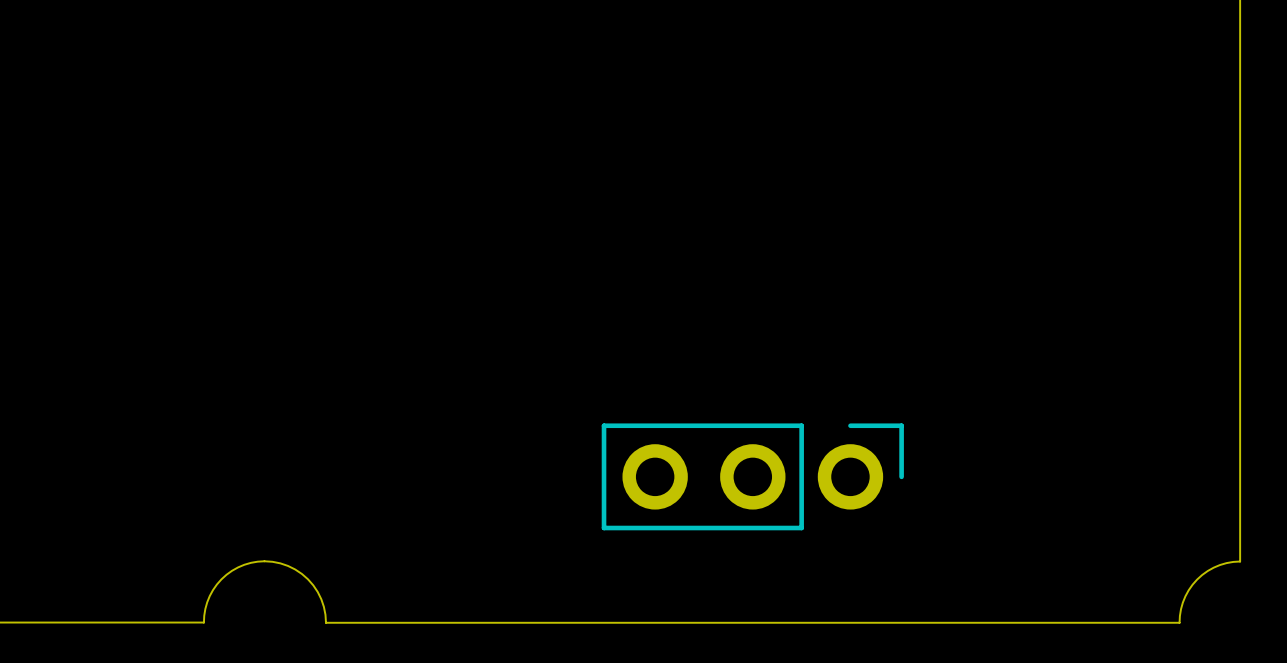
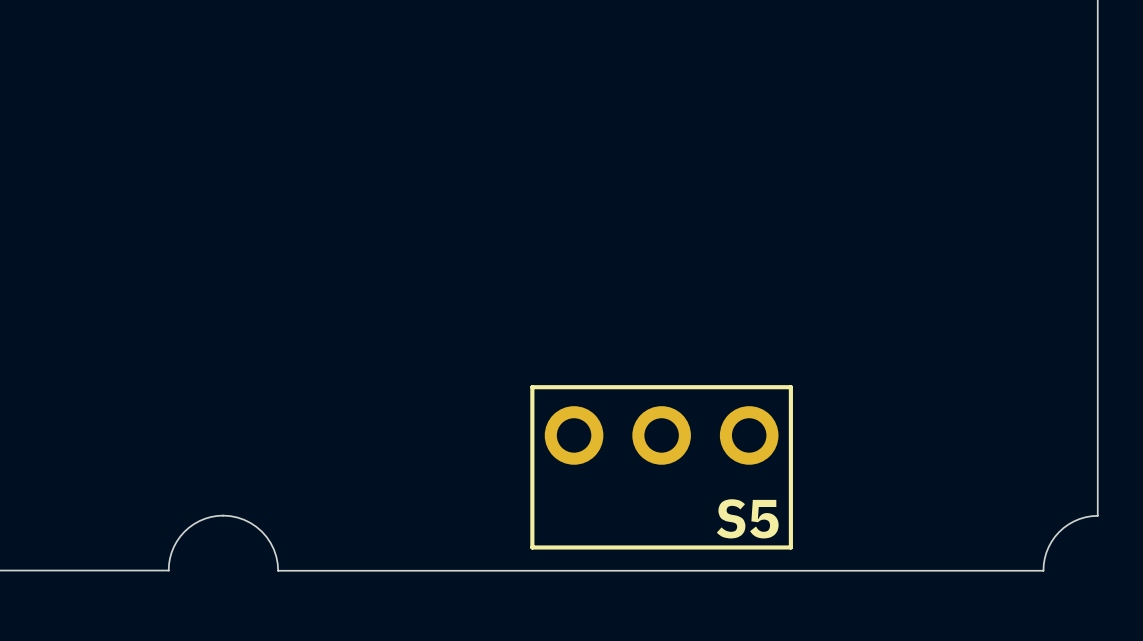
line: none -> (790, 387) (790, 547) (532, 547) (532, 387) (790, 387)
part footprint: [601, 423, 904, 531] -> [544, 406, 779, 465]
text: none -> S5 (747, 518)

